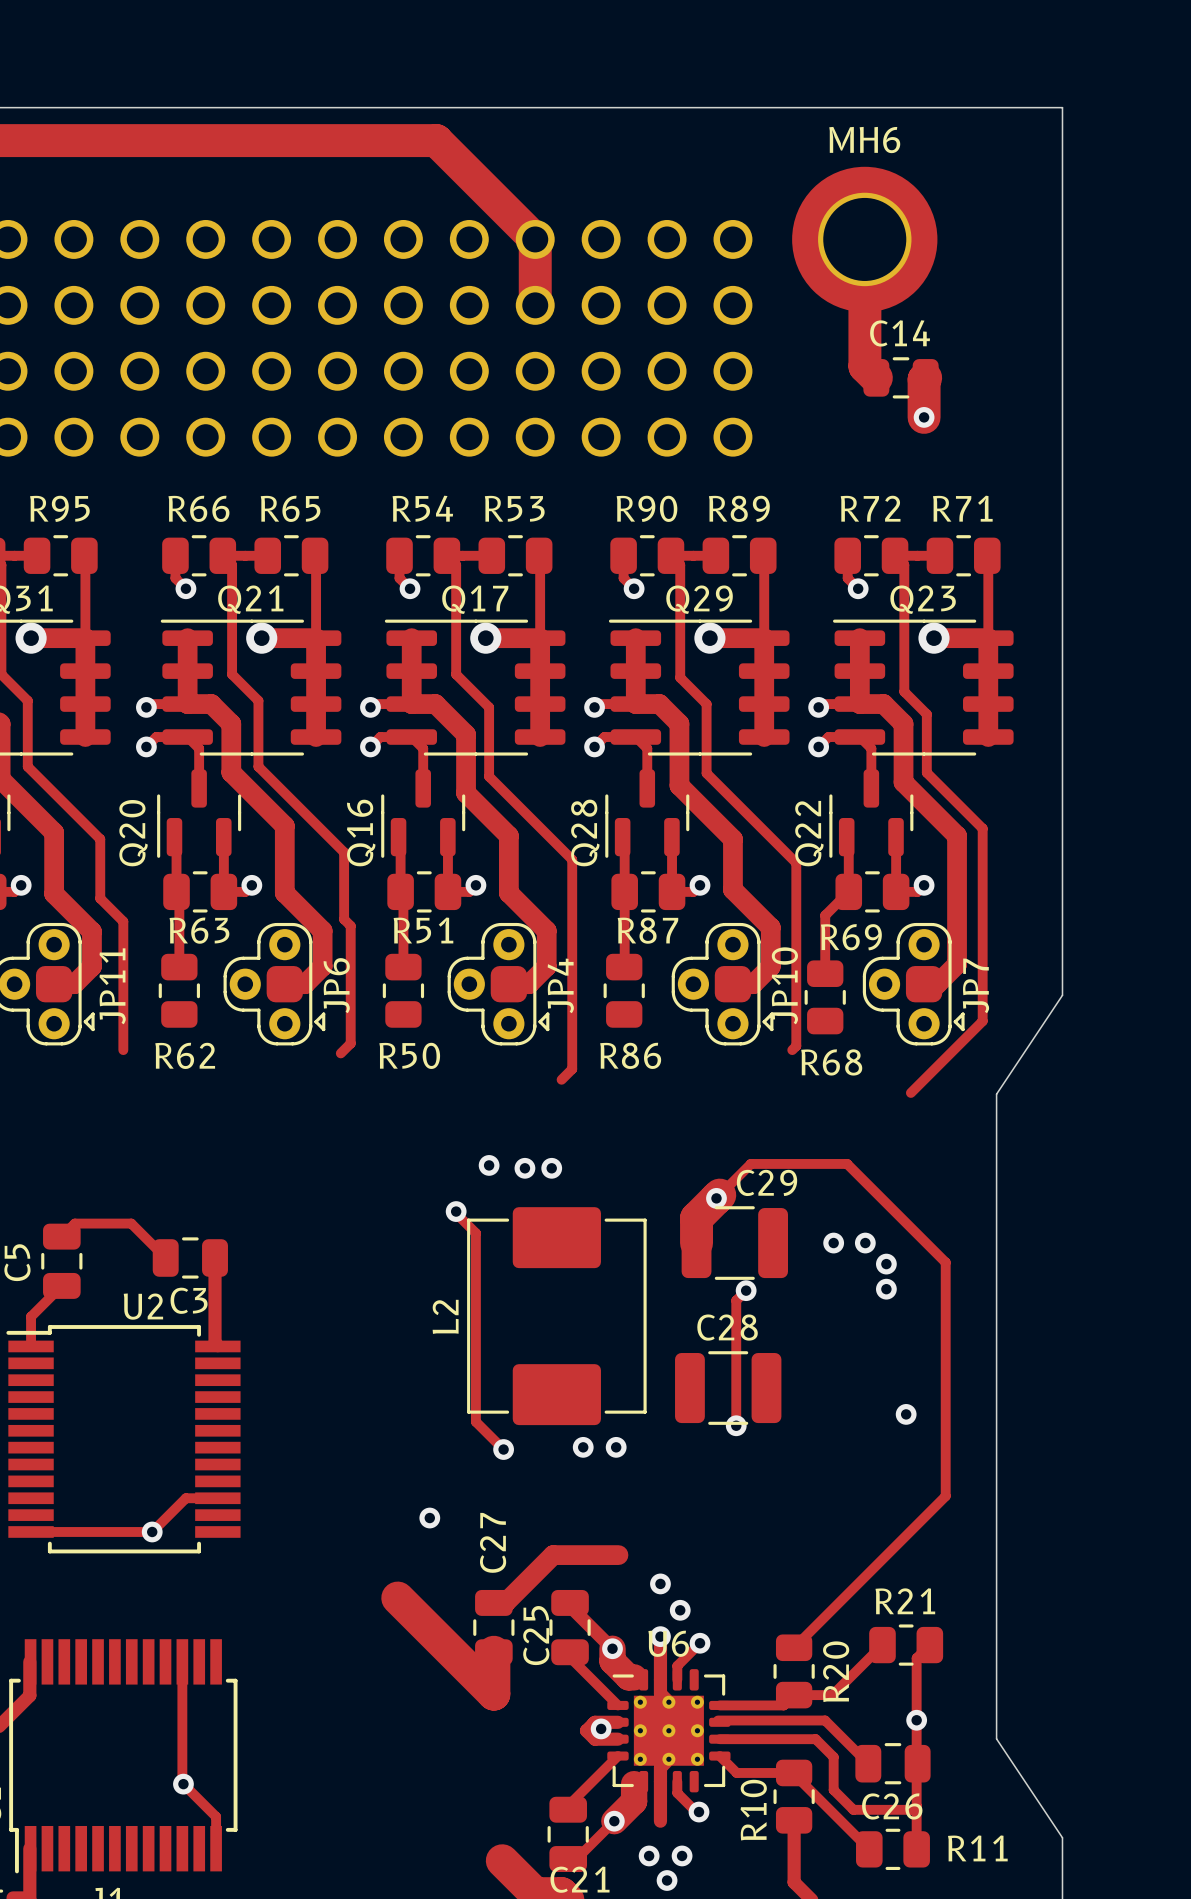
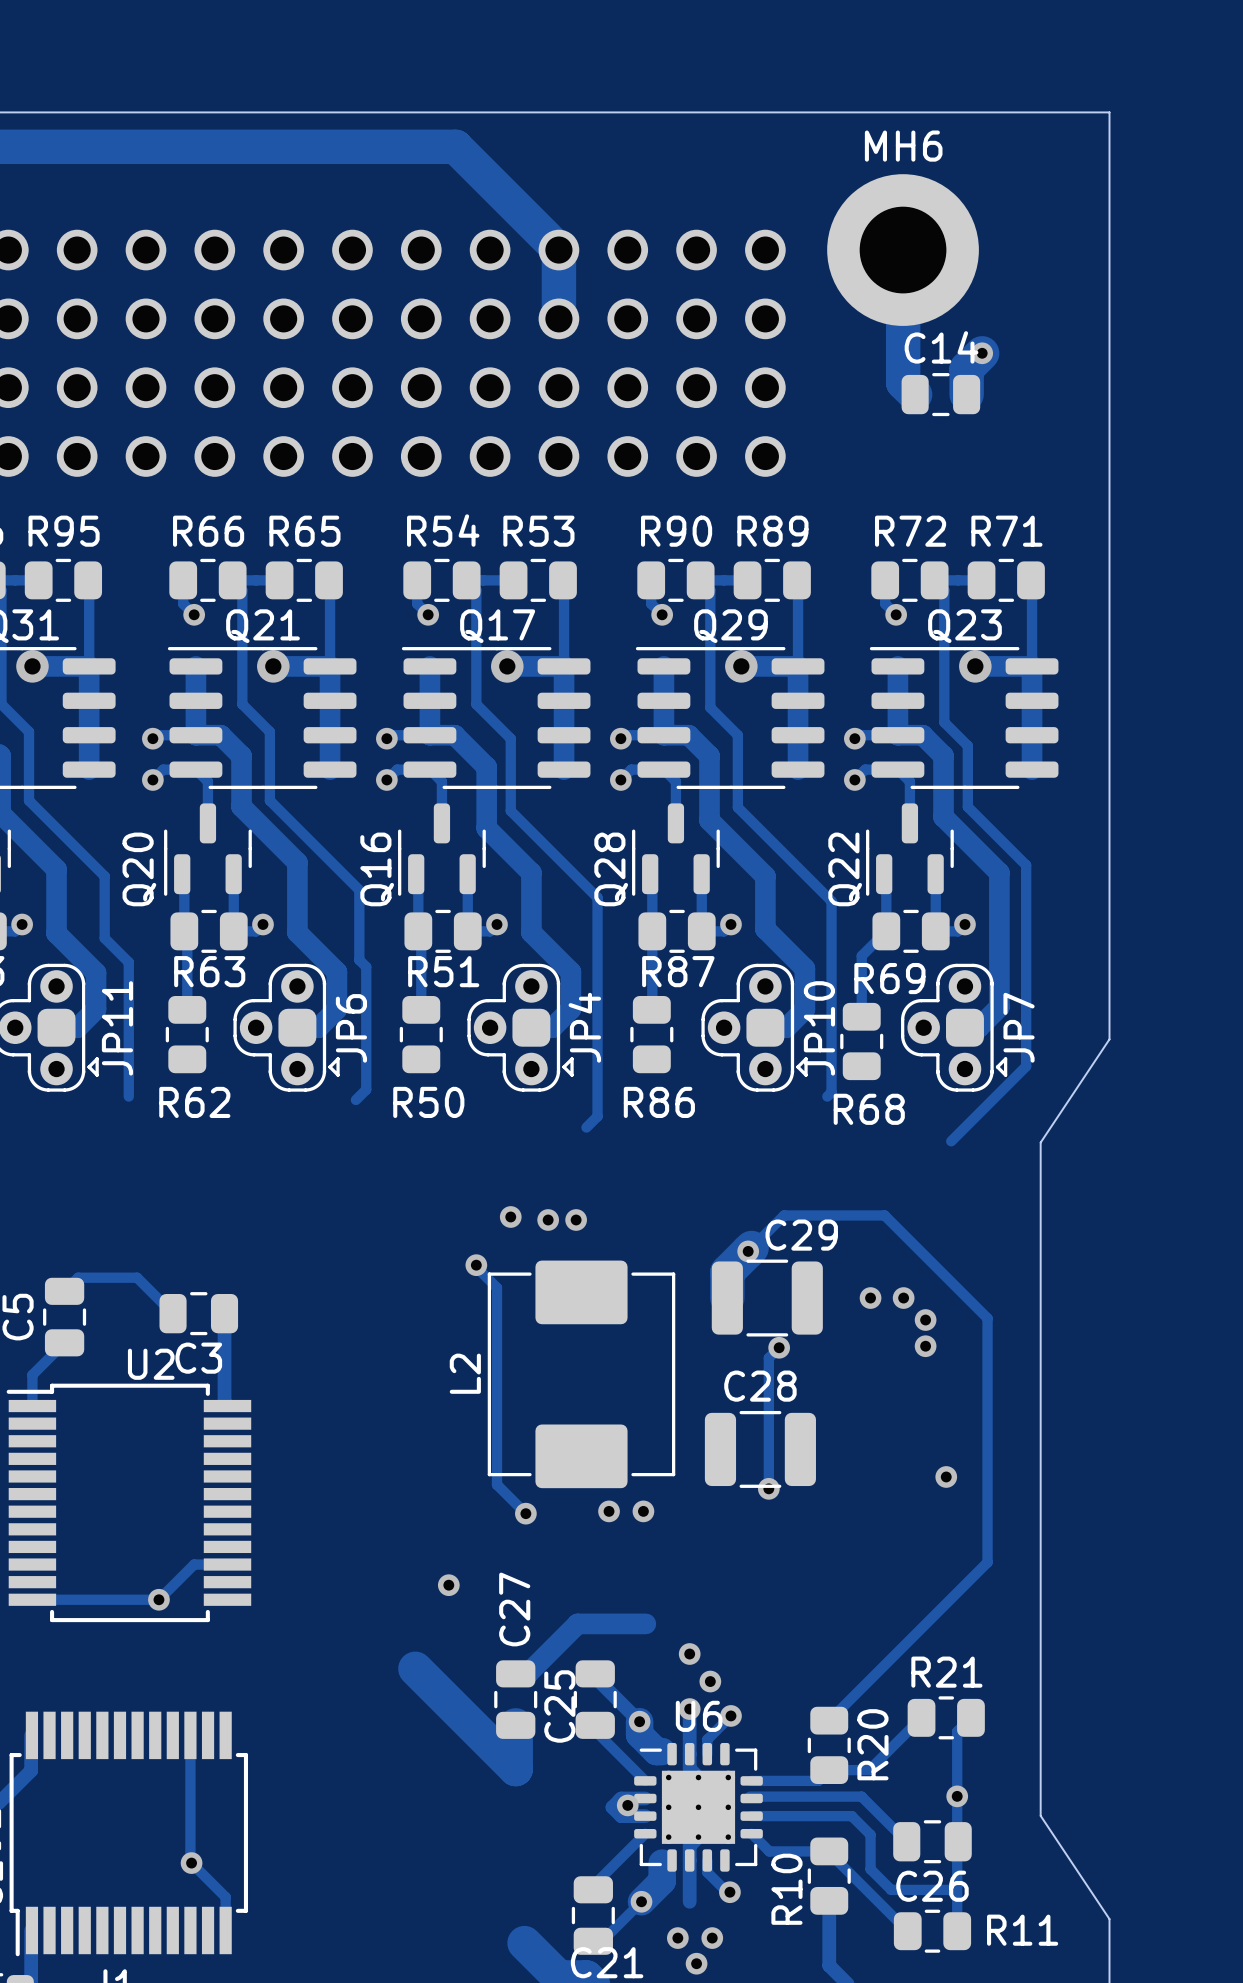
track: (925, 377) (924, 379) (924, 417) -> (966, 394) (966, 368) (982, 353)
via position: (924, 417) -> (982, 353)

